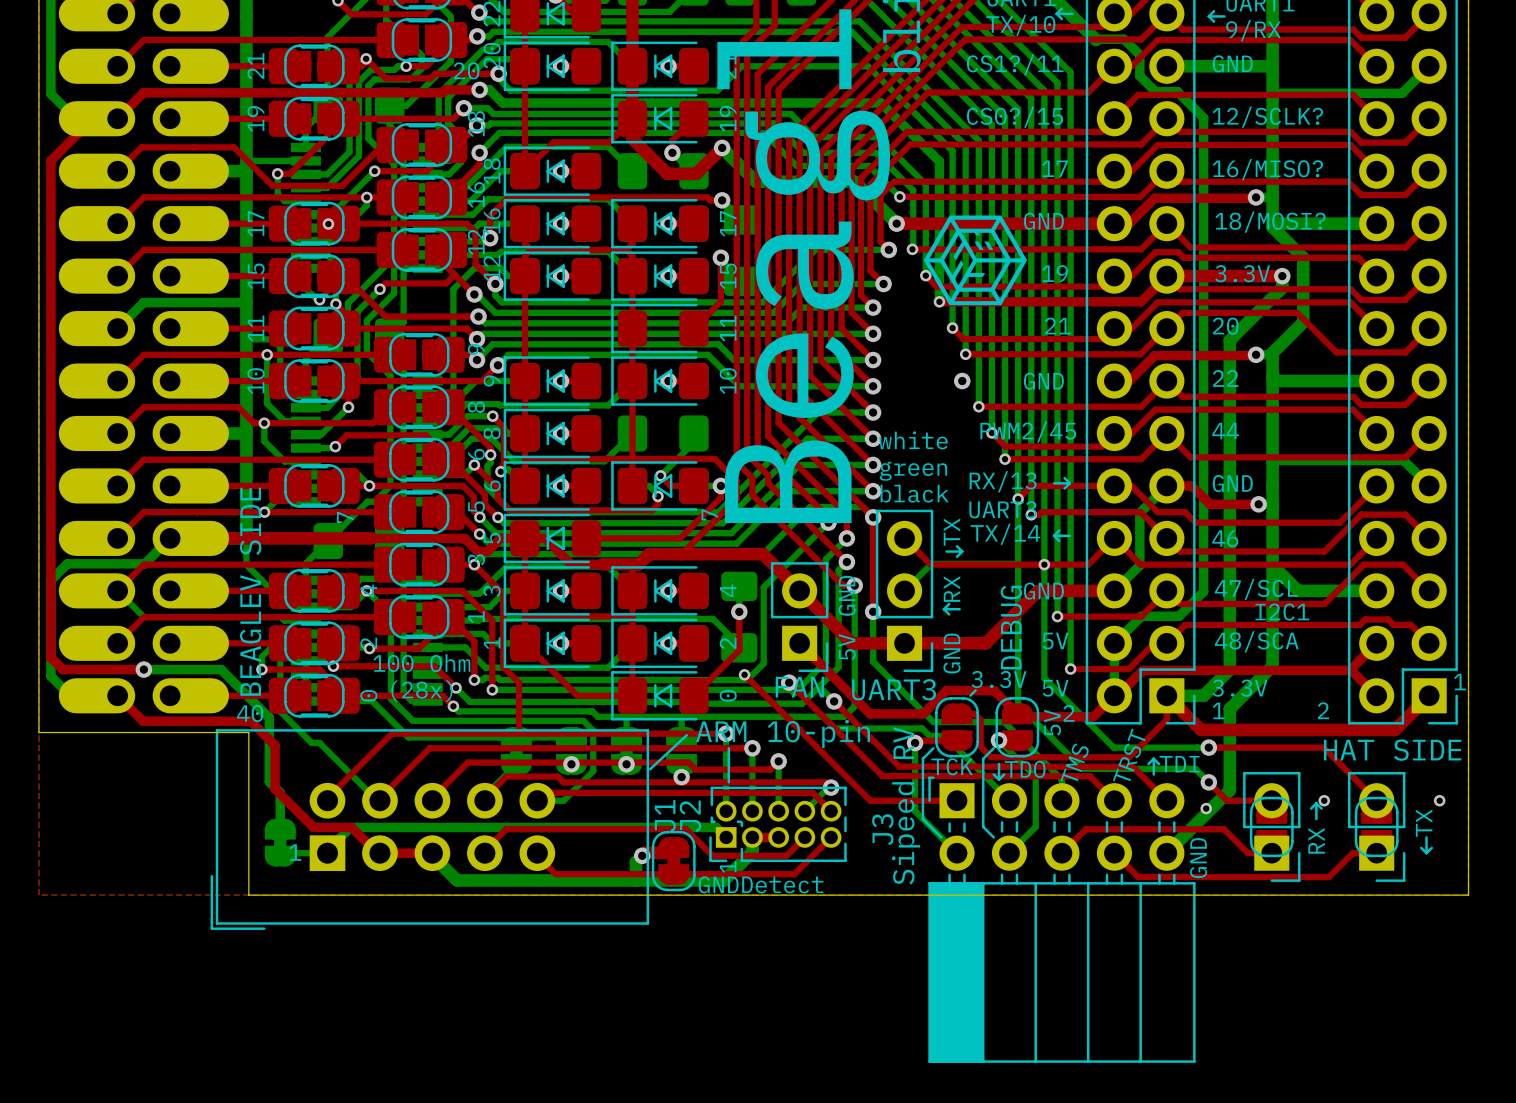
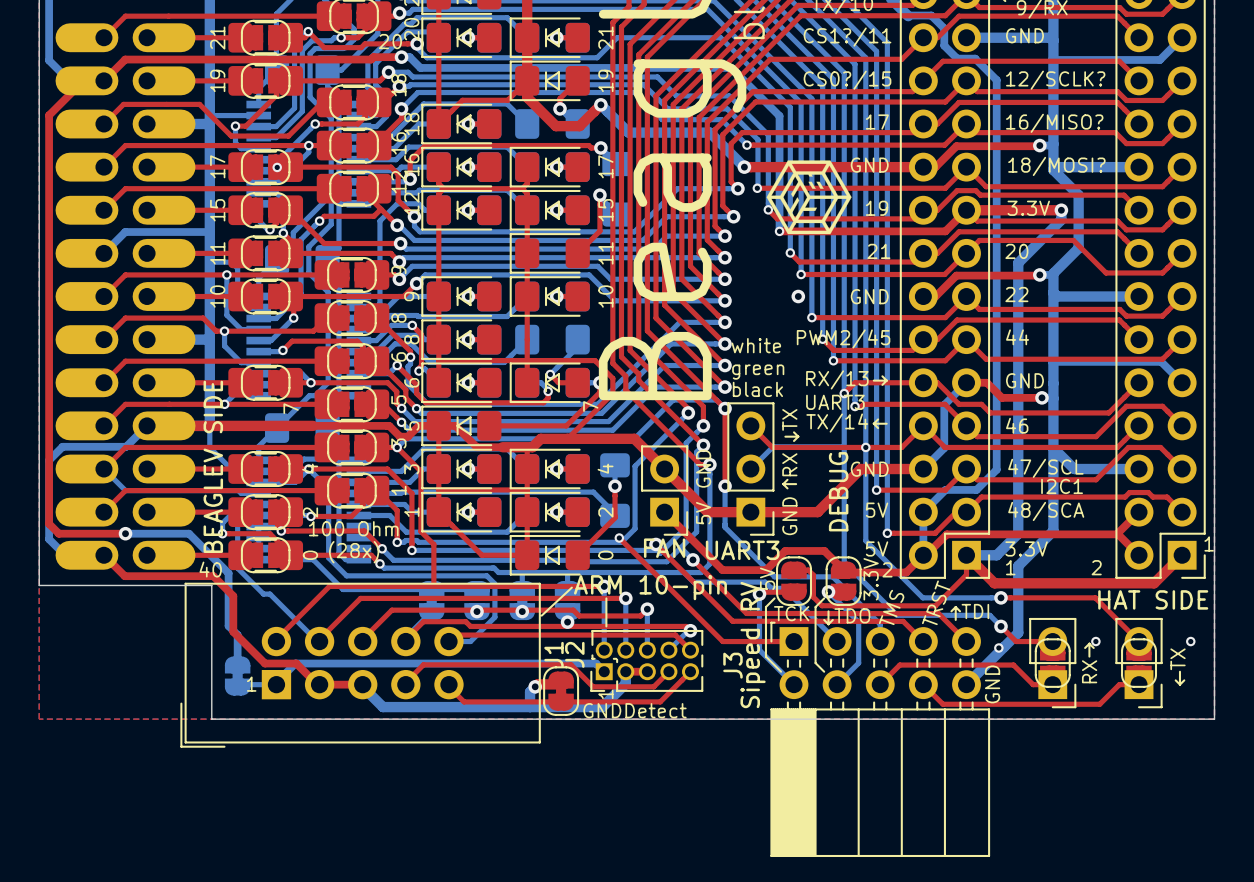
text rotation: 0° (999, 679) -> 90° counterclockwise (871, 579)
line: (975, 690) (970, 695) -> none
text position: 5V (1052, 722) -> 5V (767, 578)

